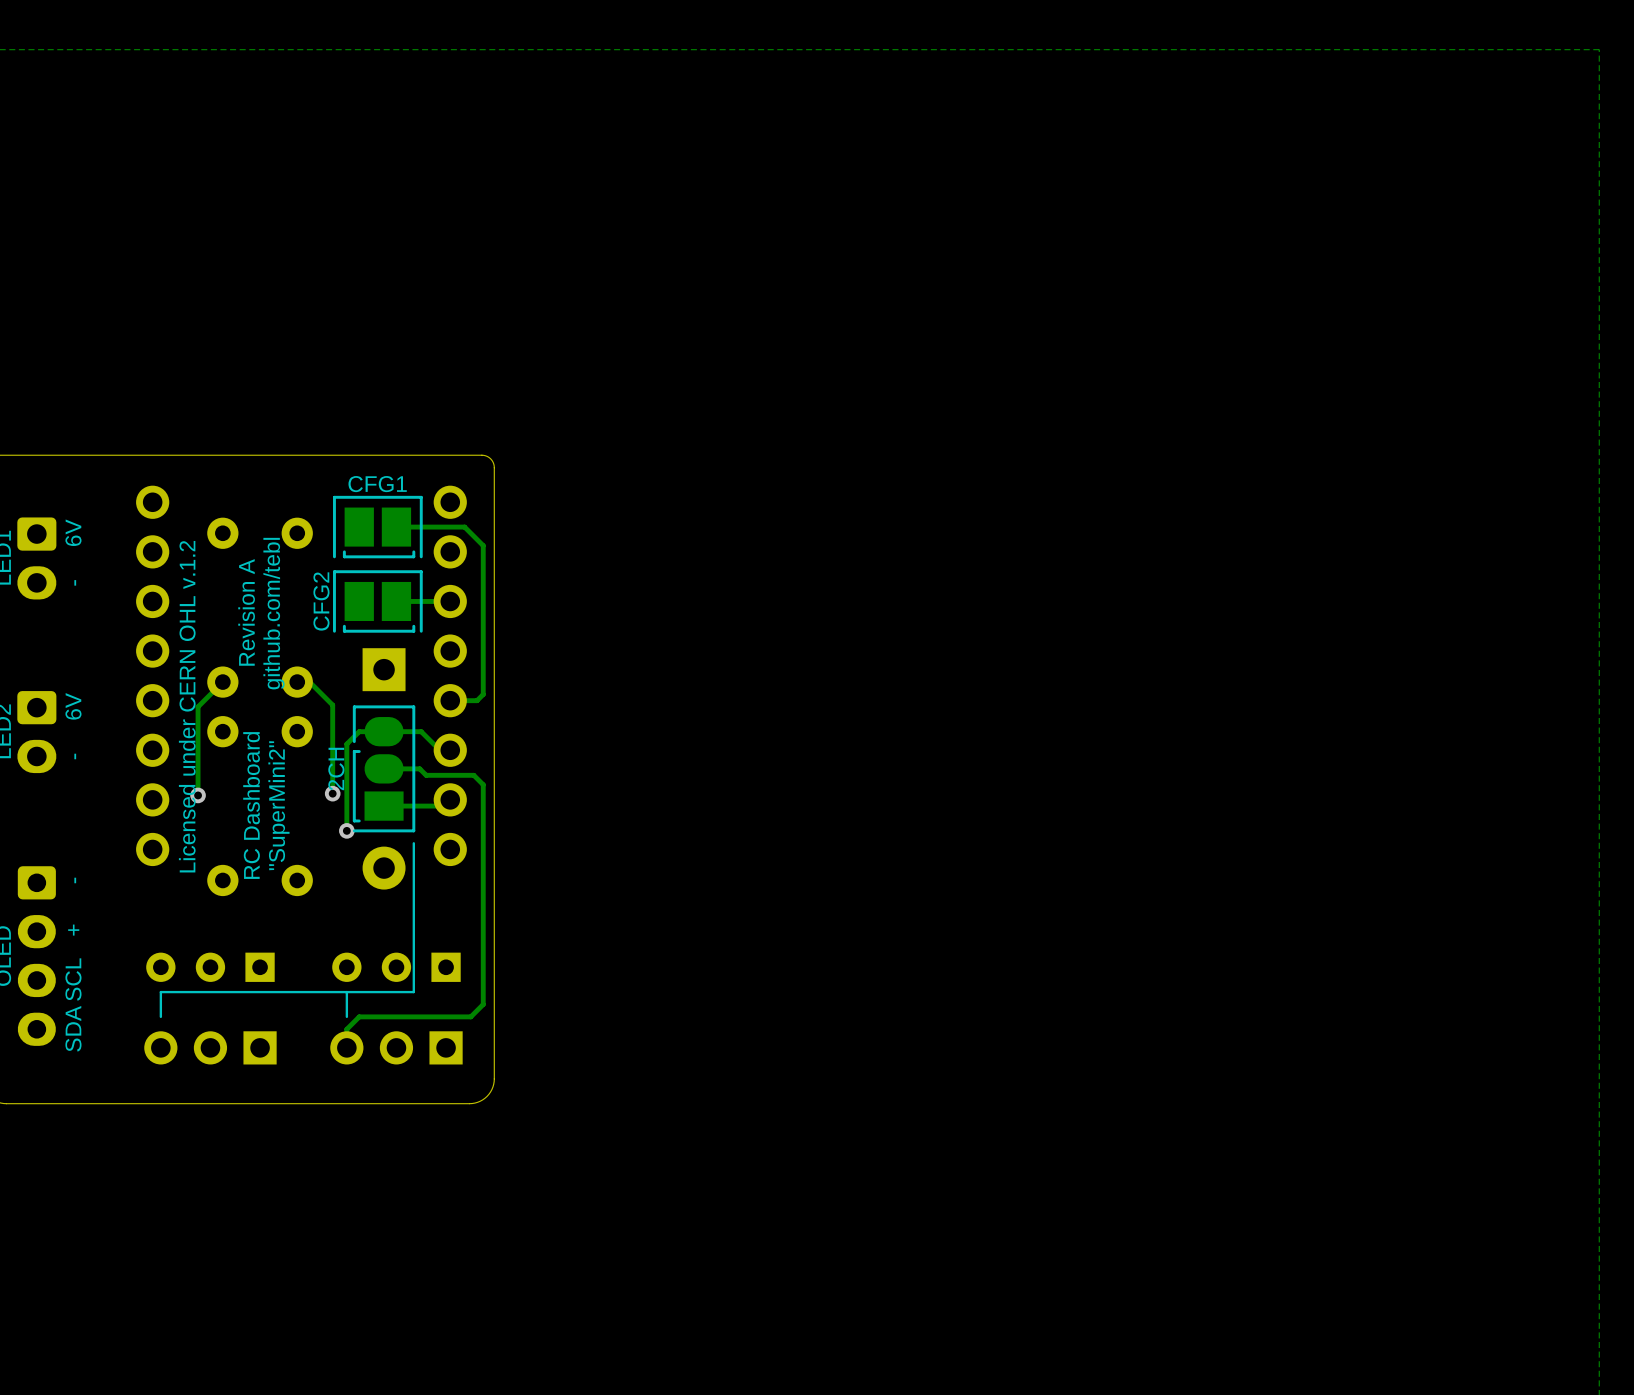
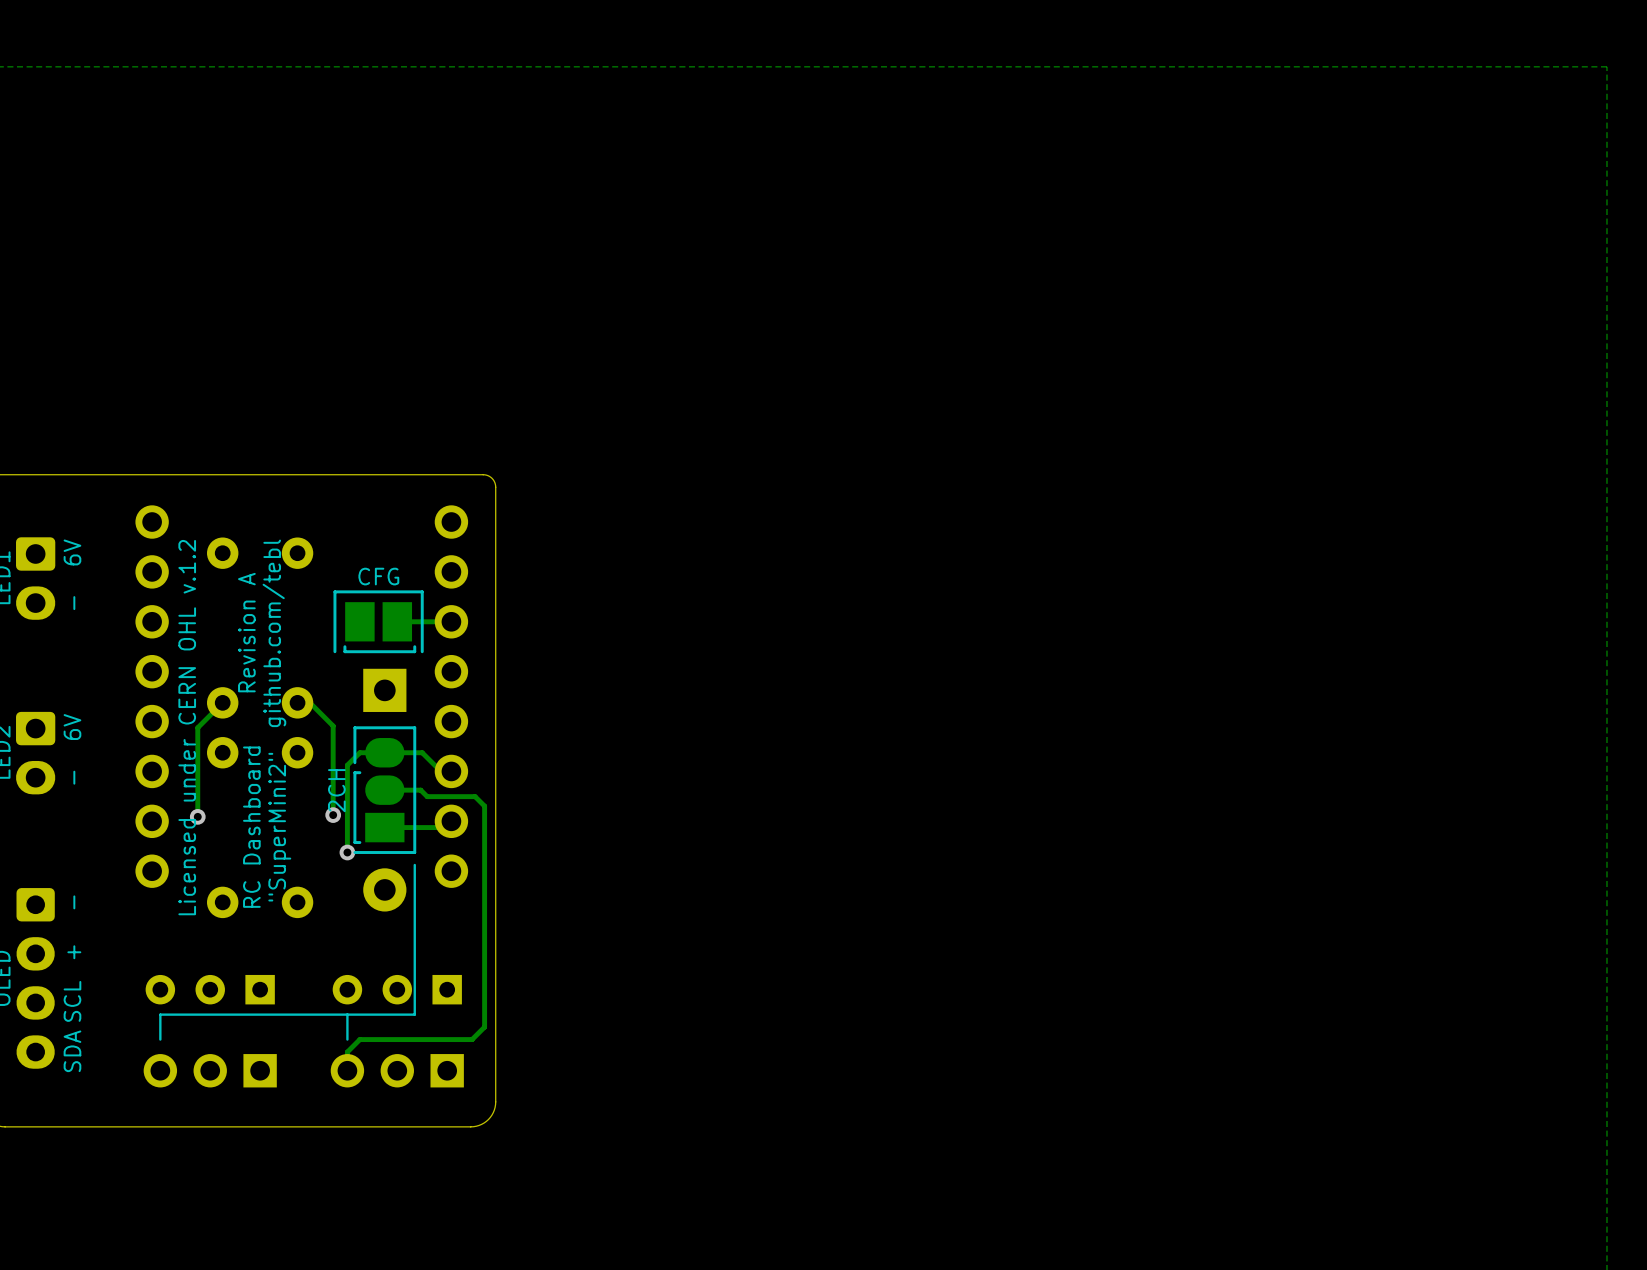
part: CFG1 (377, 527) -> none
track: (396, 527) (464, 527) (483, 545) (483, 694) (477, 700) (450, 700) -> none
part value: CFG2 (321, 601) -> CFG (378, 576)

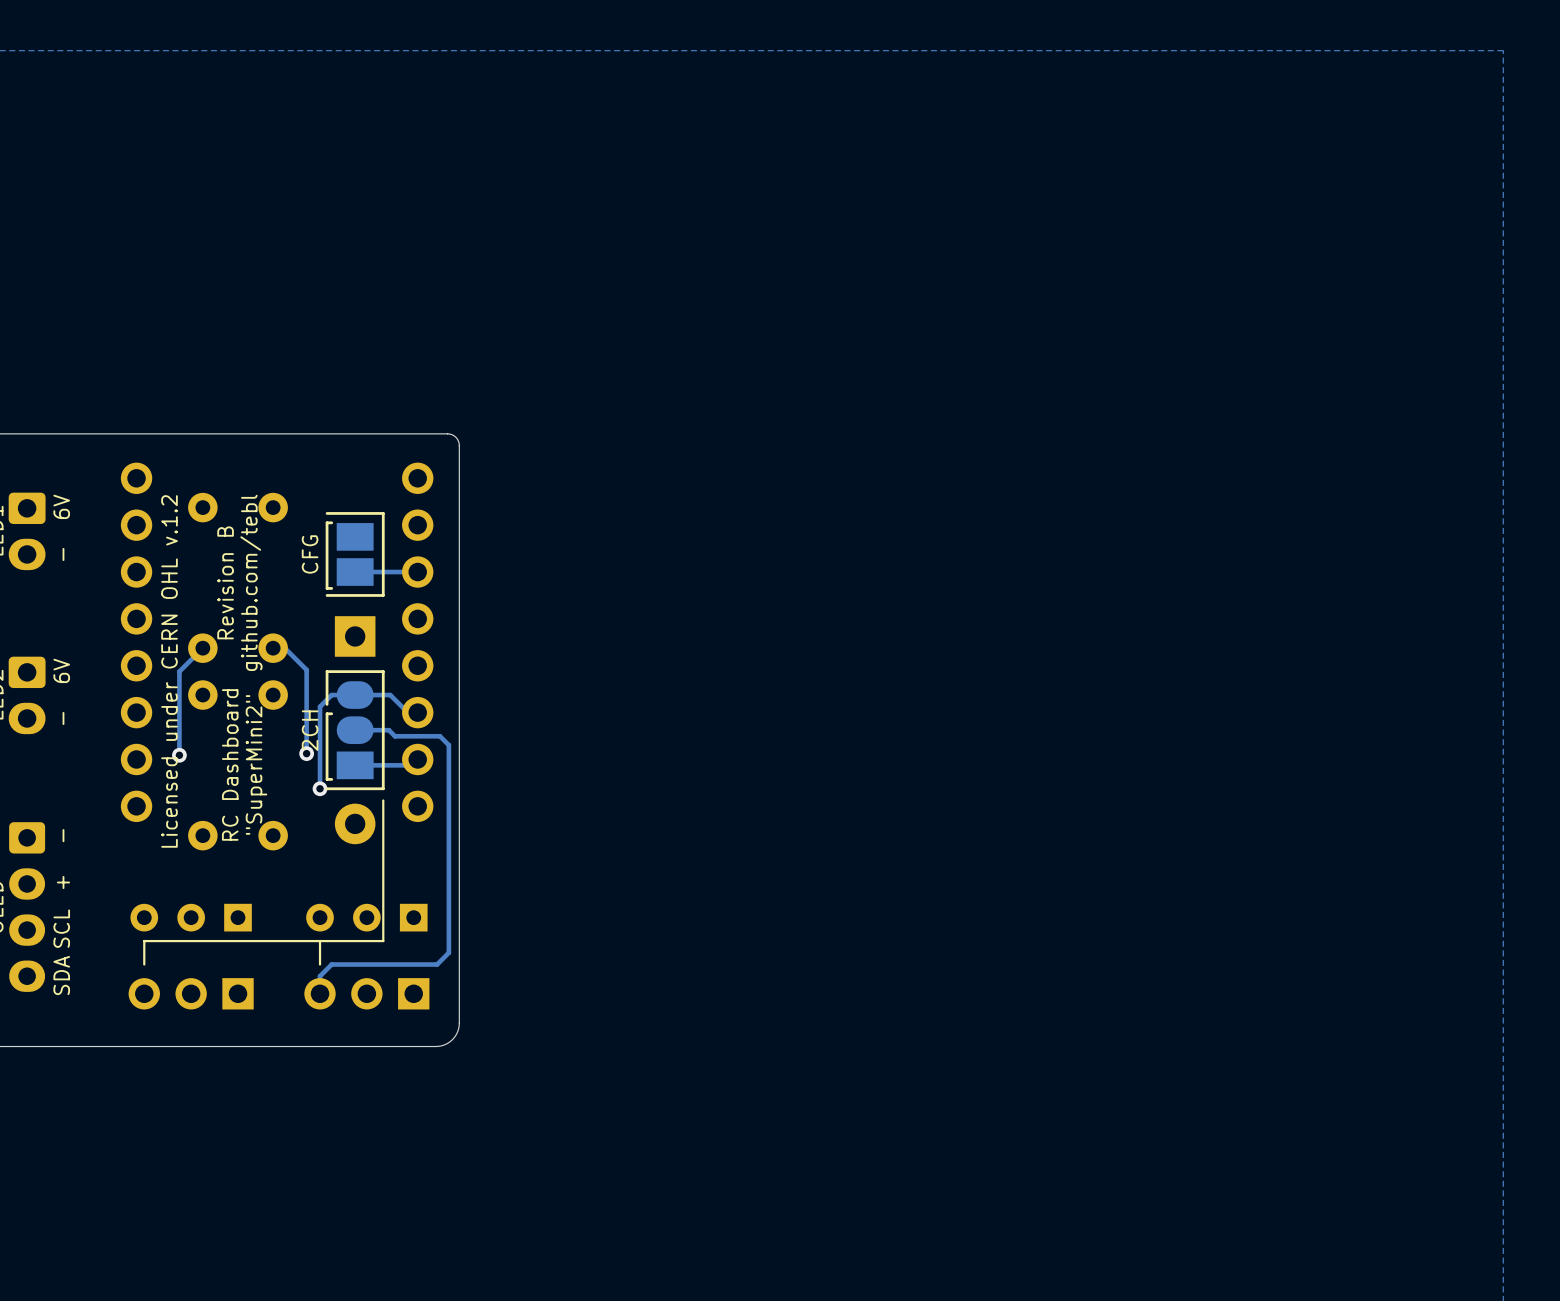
part value position: CFG (378, 576) -> CFG (310, 554)
part rotation: 0° (378, 621) -> 90° clockwise (355, 554)
text: Revision A (246, 632) -> Revision B (225, 582)

